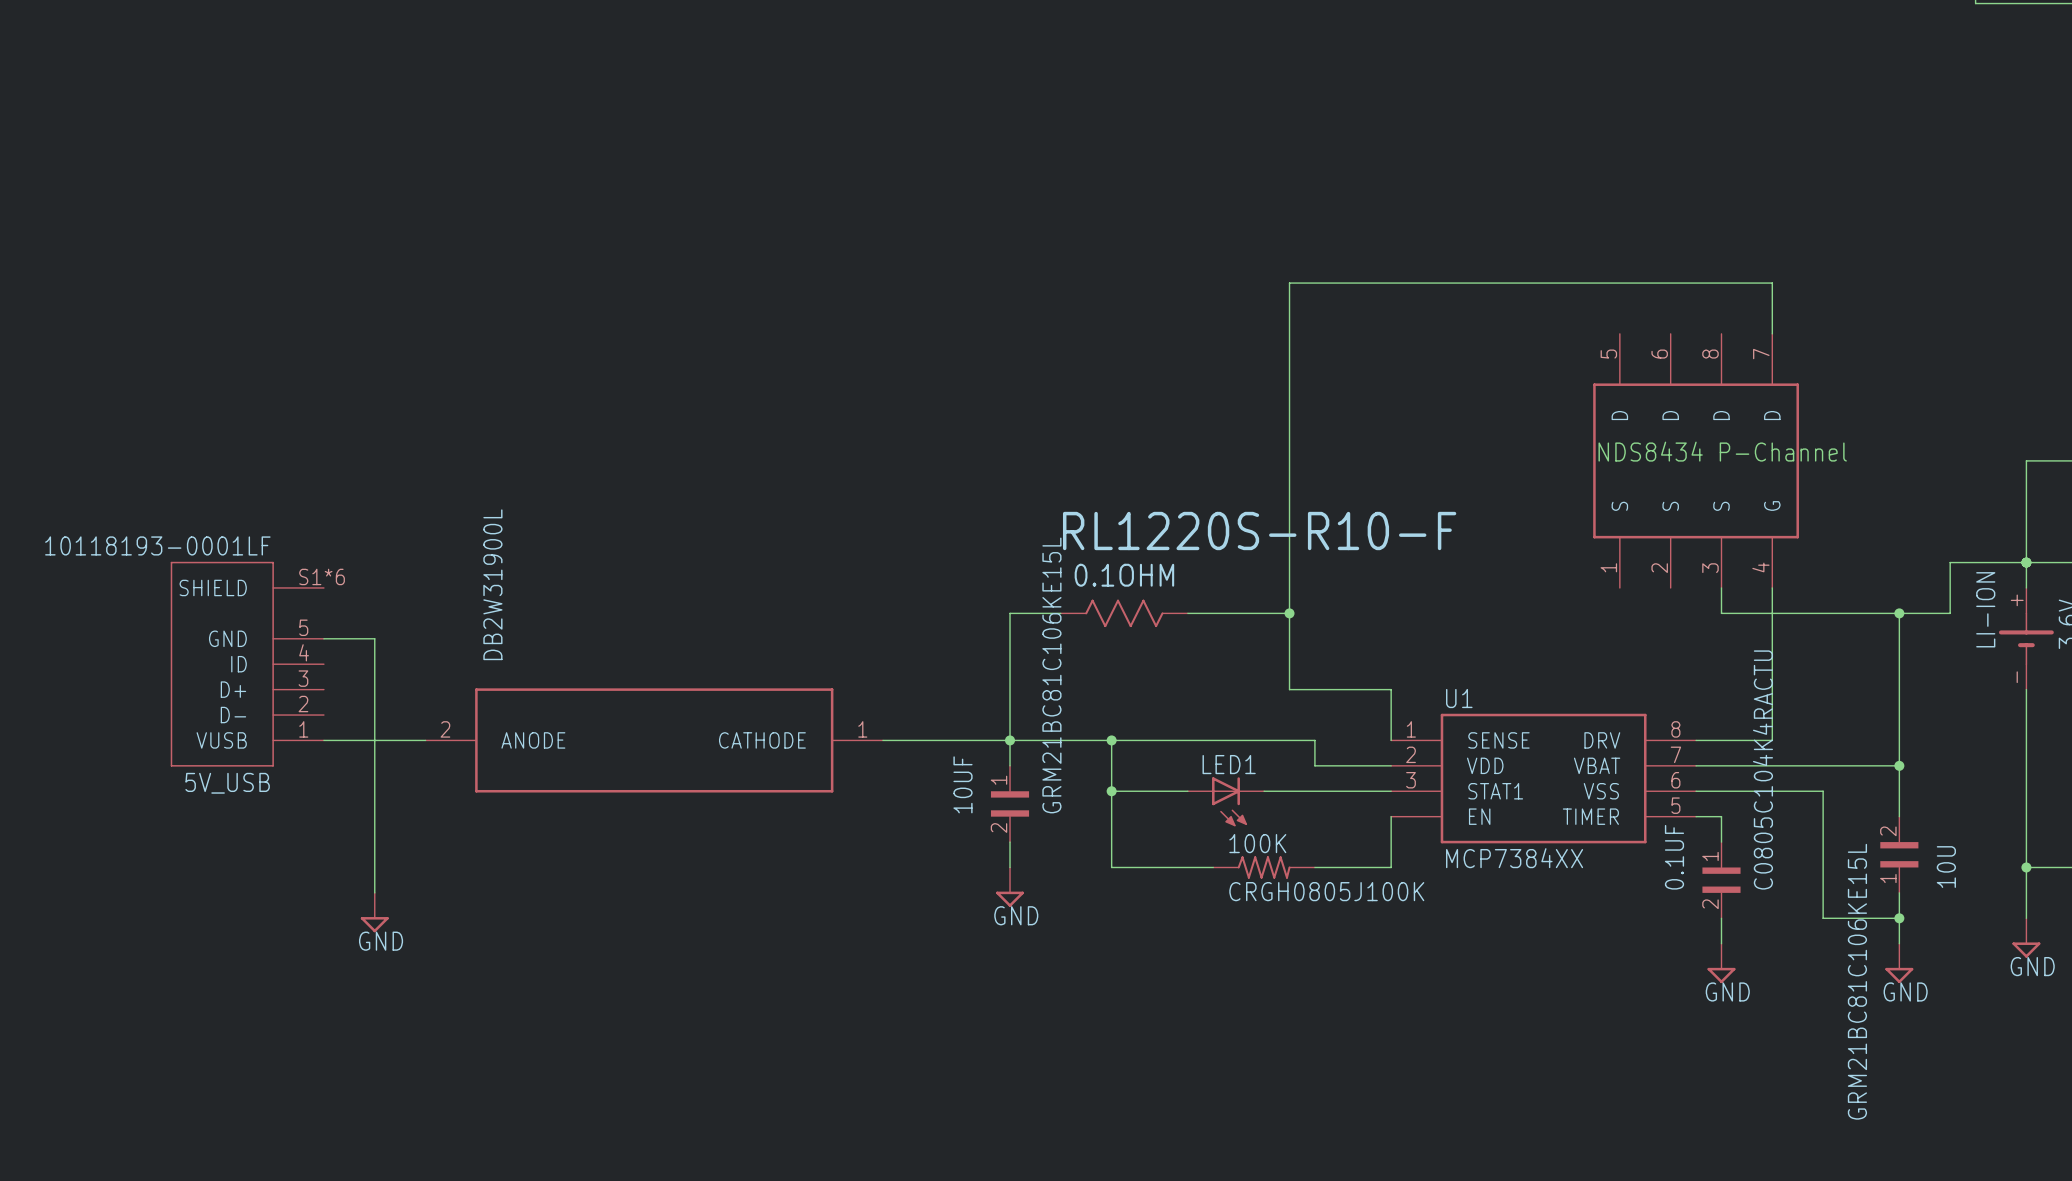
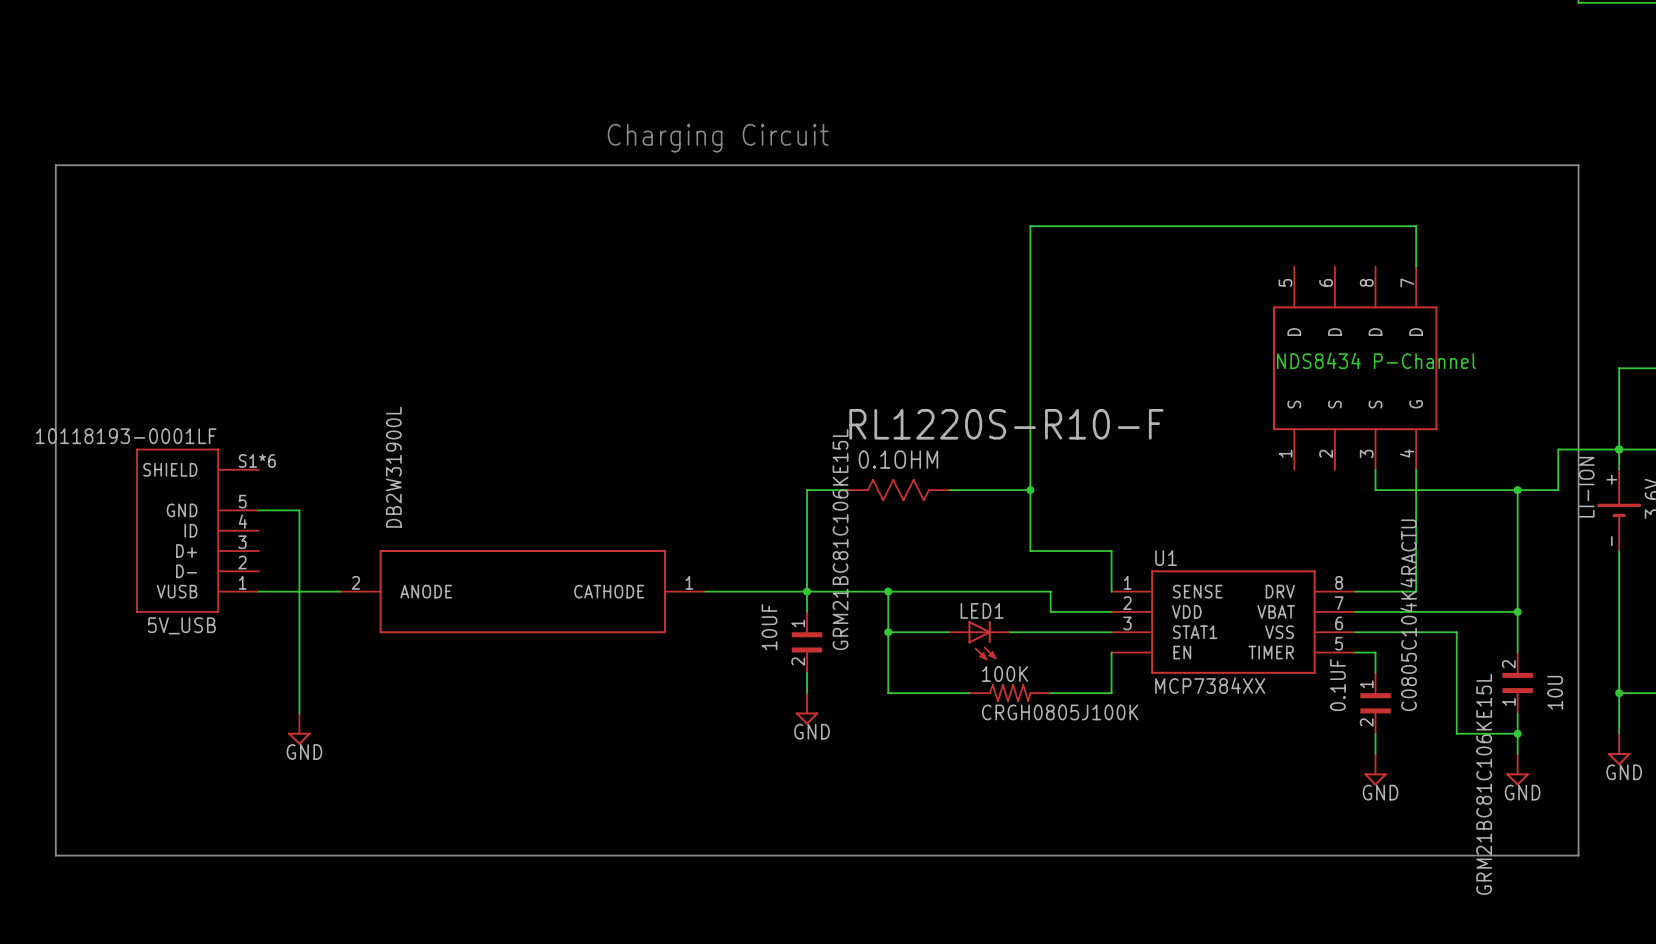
text: none -> Charging Circuit (718, 138)
bus: none -> (55, 165) (1578, 165) (1578, 855) (55, 855) (55, 165)

